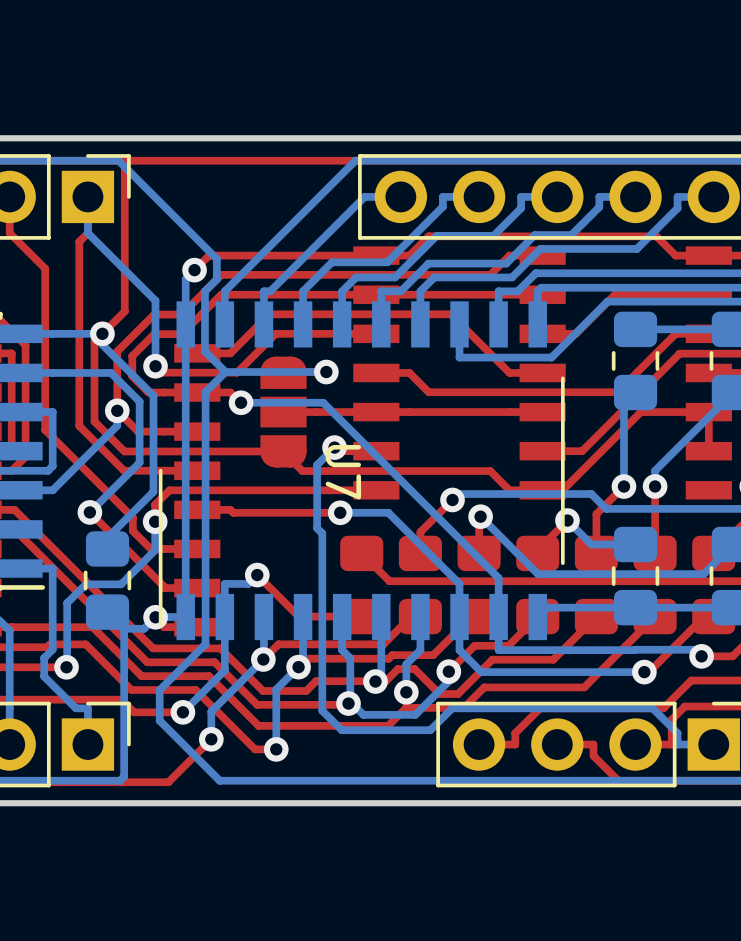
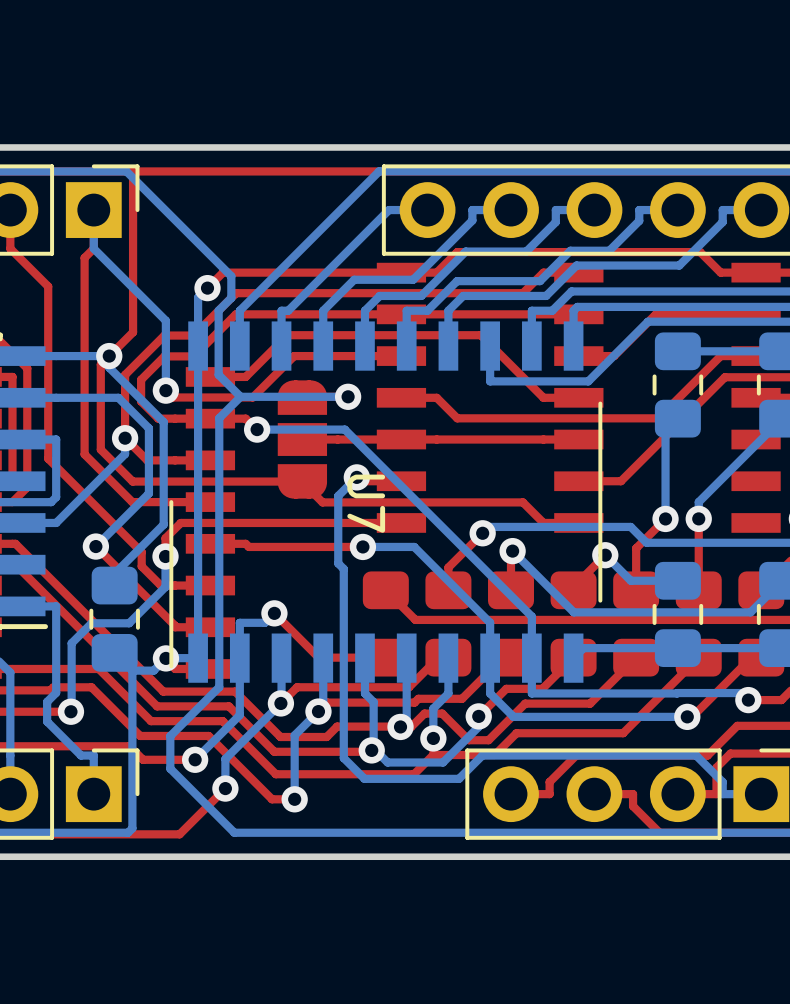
top track: (708, 451) (708, 412) (640, 412) (562, 490) (542, 490) -> none

